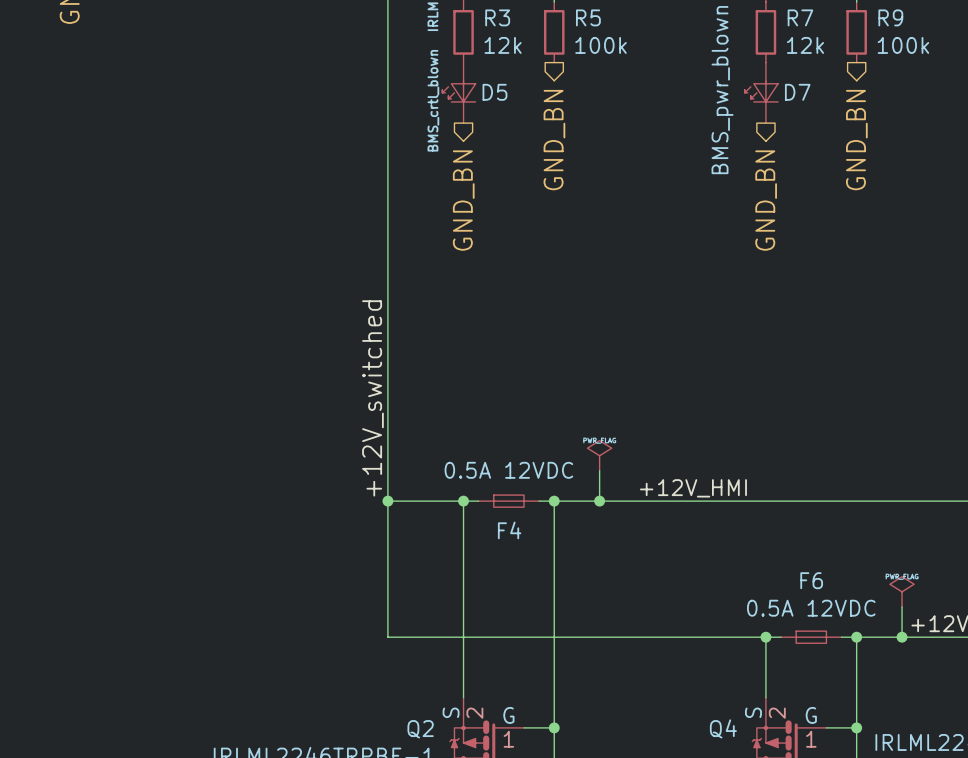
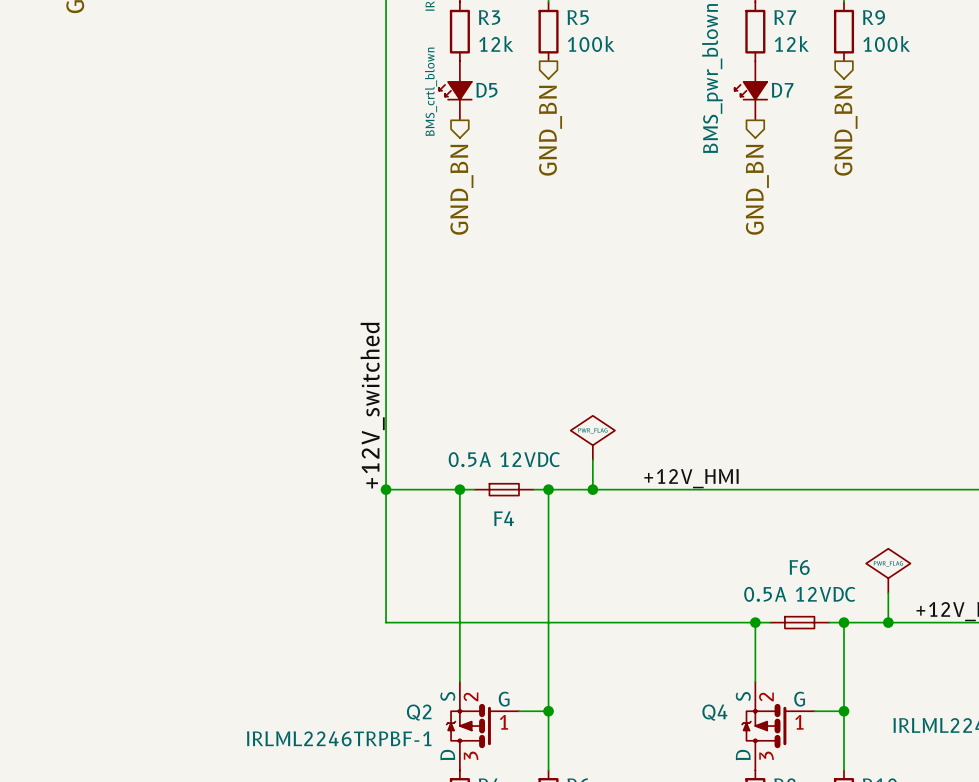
D5 symbol: [442, 62, 476, 124] -> [439, 61, 472, 121]
D7 symbol: [744, 62, 779, 124] -> [734, 61, 768, 121]
power symbol shape: [587, 440, 612, 471] -> [570, 415, 616, 461]
power symbol shape: [889, 576, 915, 607] -> [866, 548, 911, 594]

